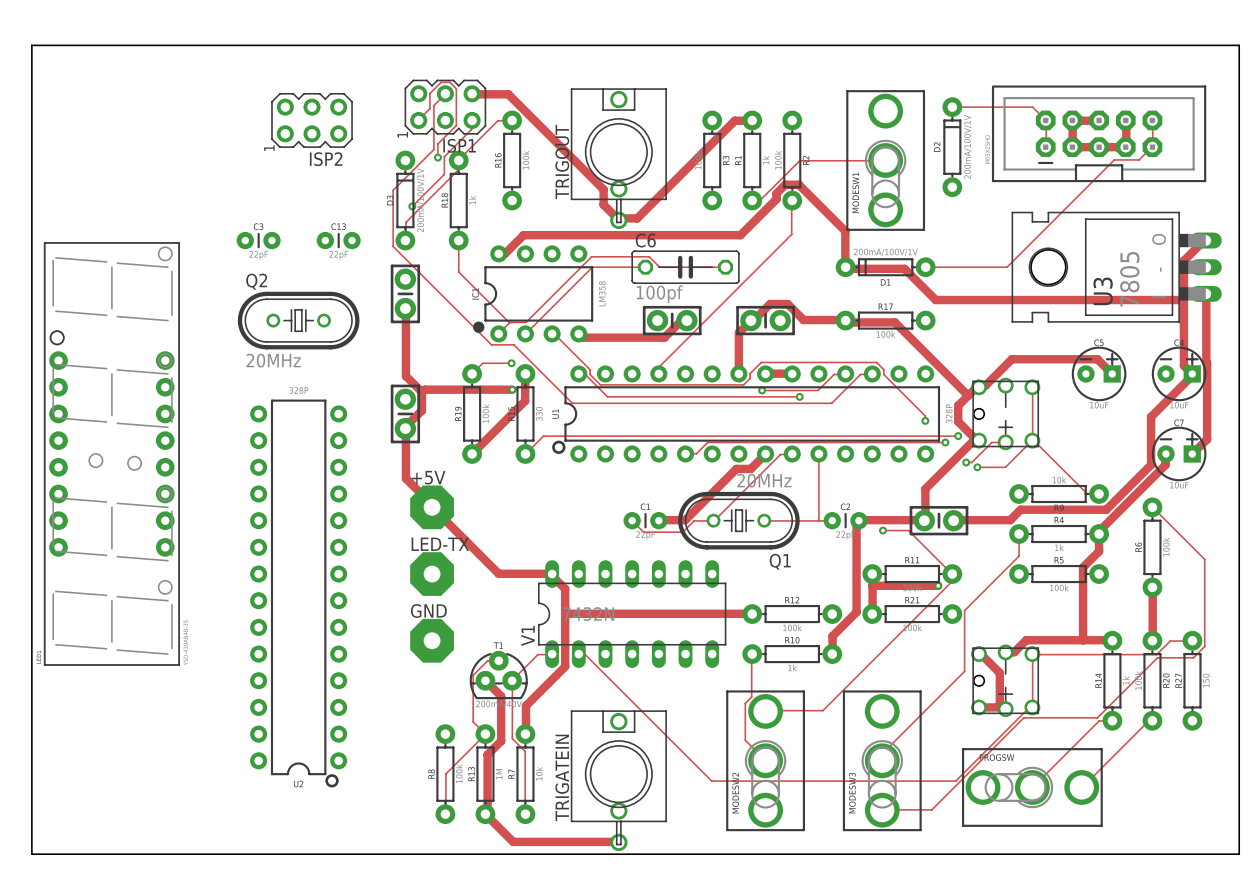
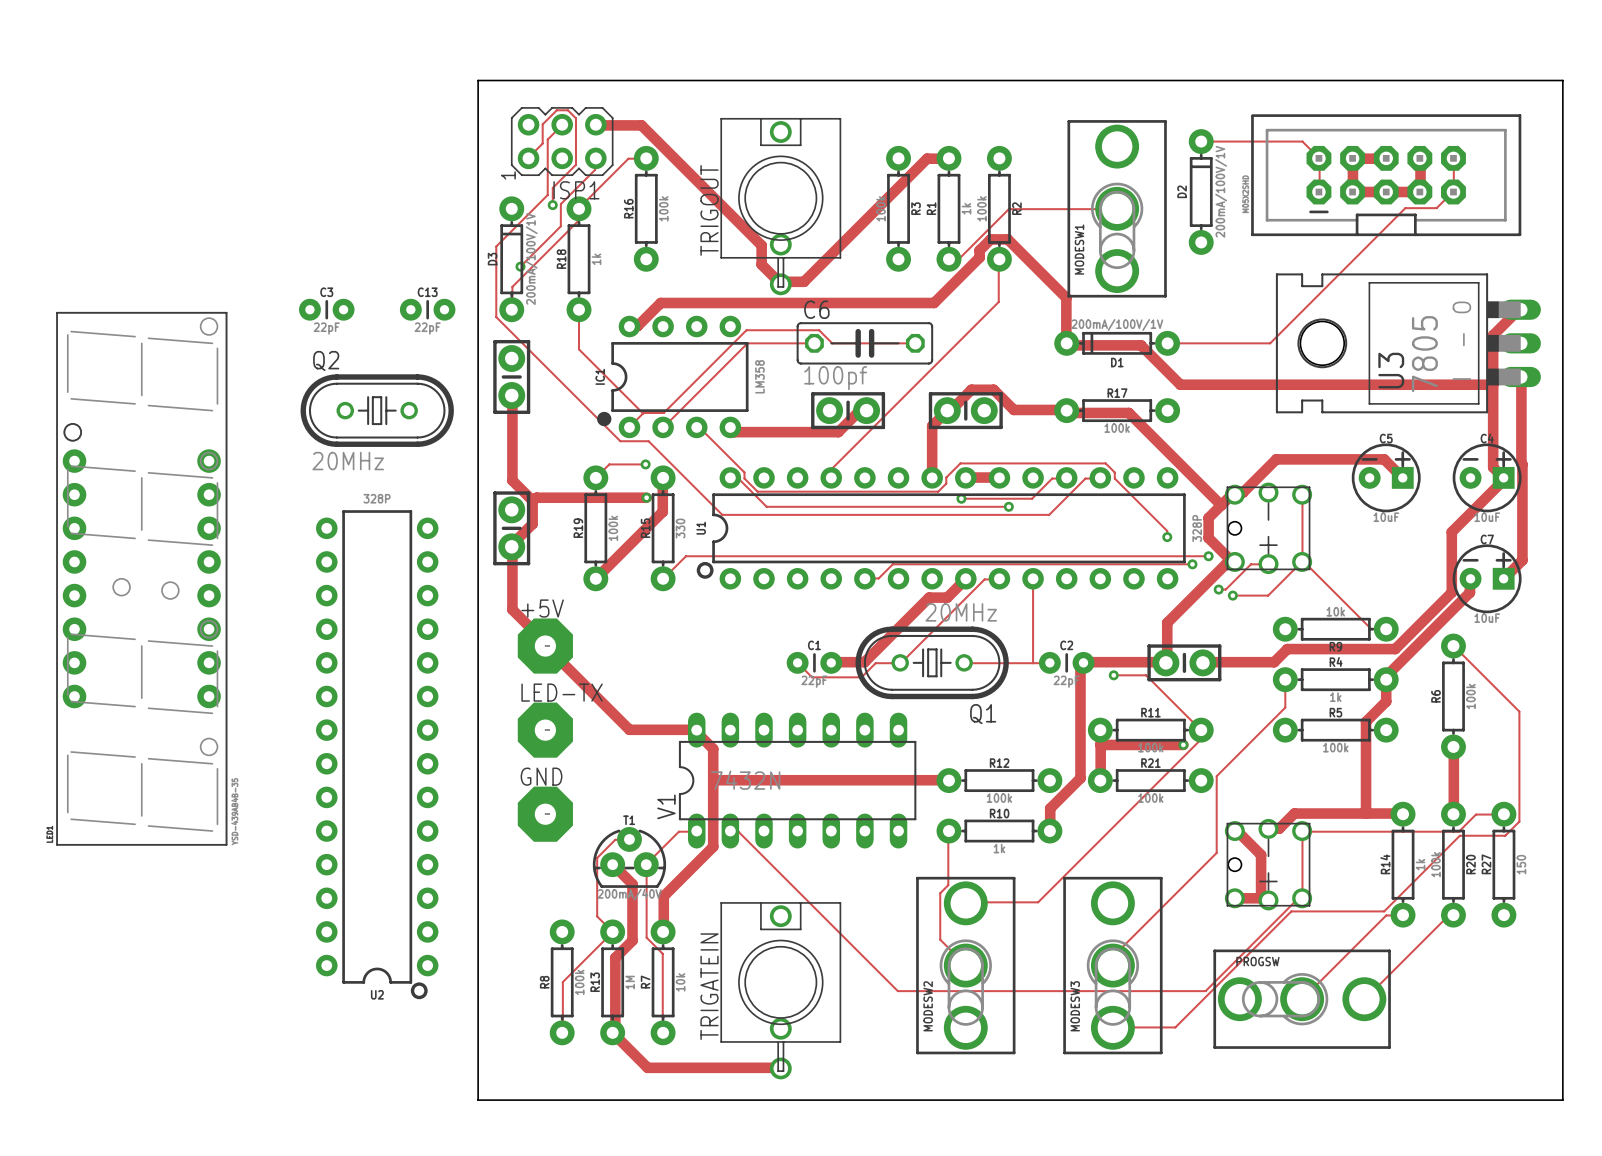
board edge: (1239, 58) (1239, 45) (31, 45) (31, 854) (1239, 854) -> (1562, 80) (478, 80) (478, 1100) (1562, 1100) (1562, 1083)
ISP2: (312, 120) -> none

